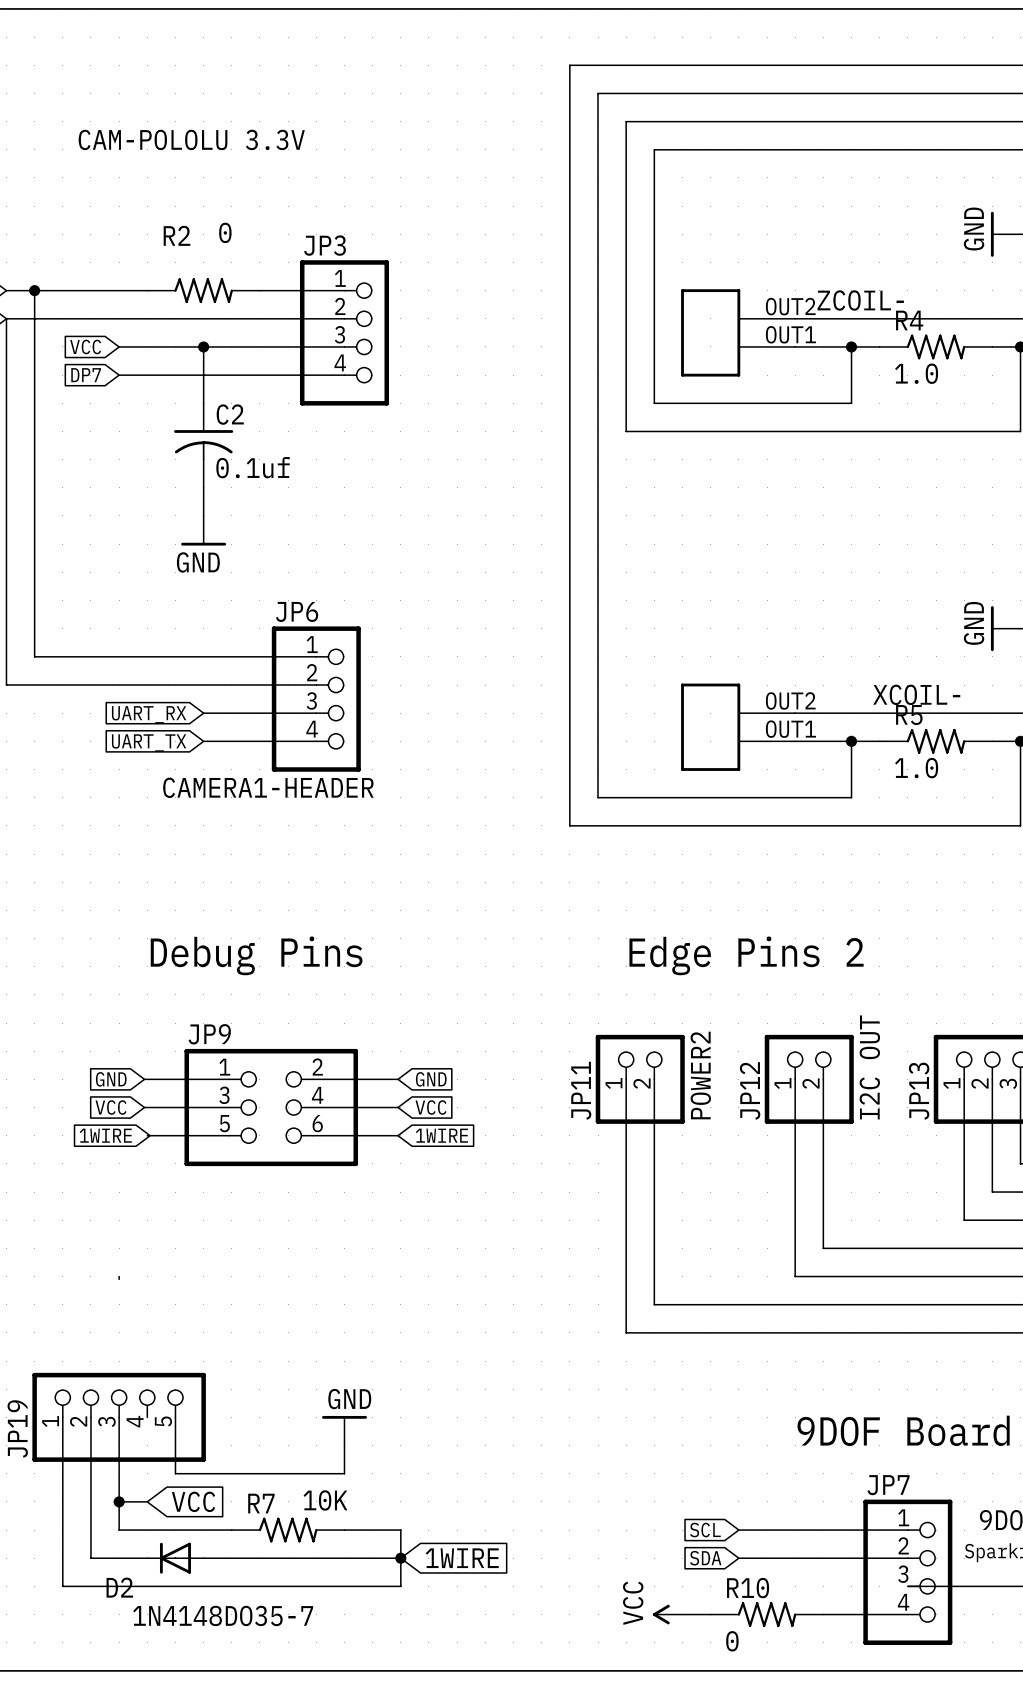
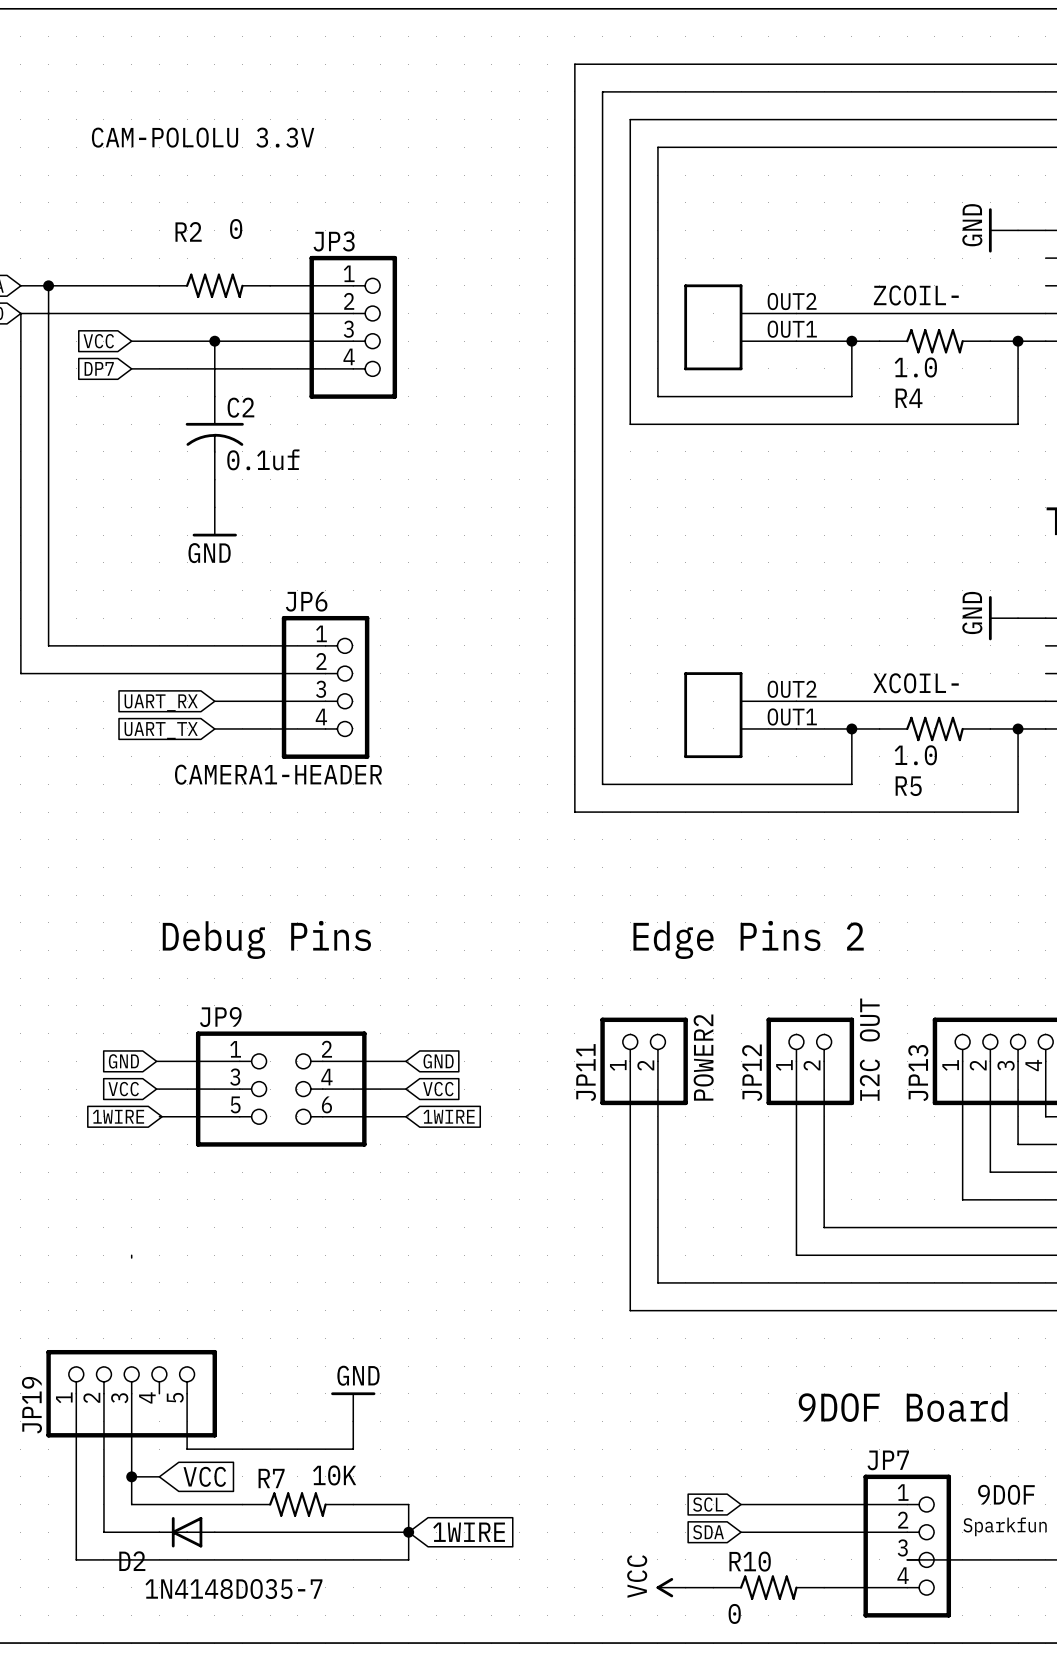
label position: ZCOIL- (860, 300) -> ZCOIL- (916, 295)
R4 name position: R4 (909, 320) -> R4 (909, 398)
R5 name position: R5 (909, 715) -> R5 (908, 786)

